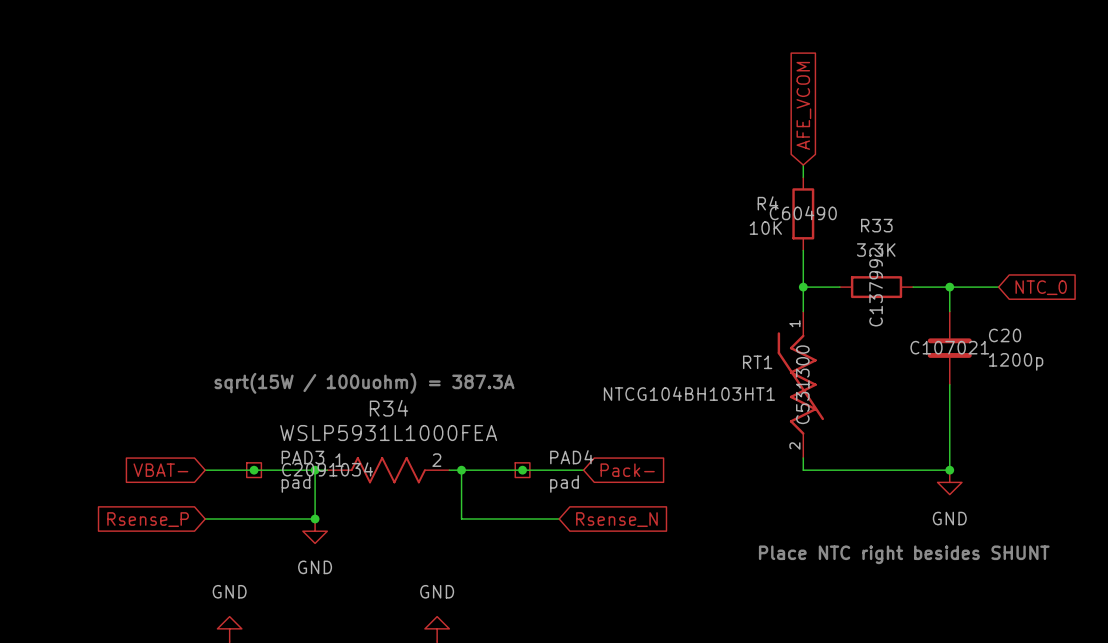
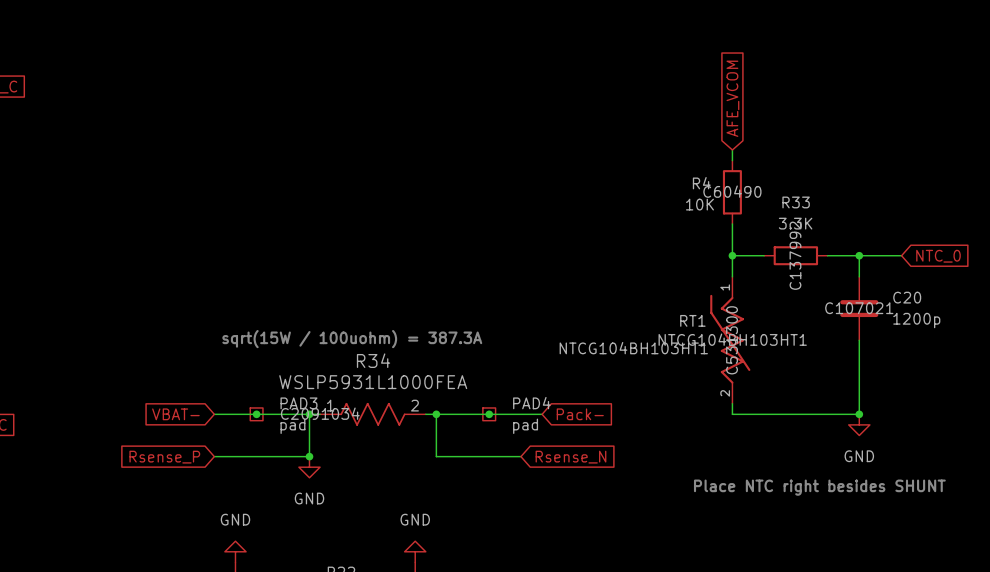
RT1 text: none -> NTCG104BH103HT1 (732, 339)

